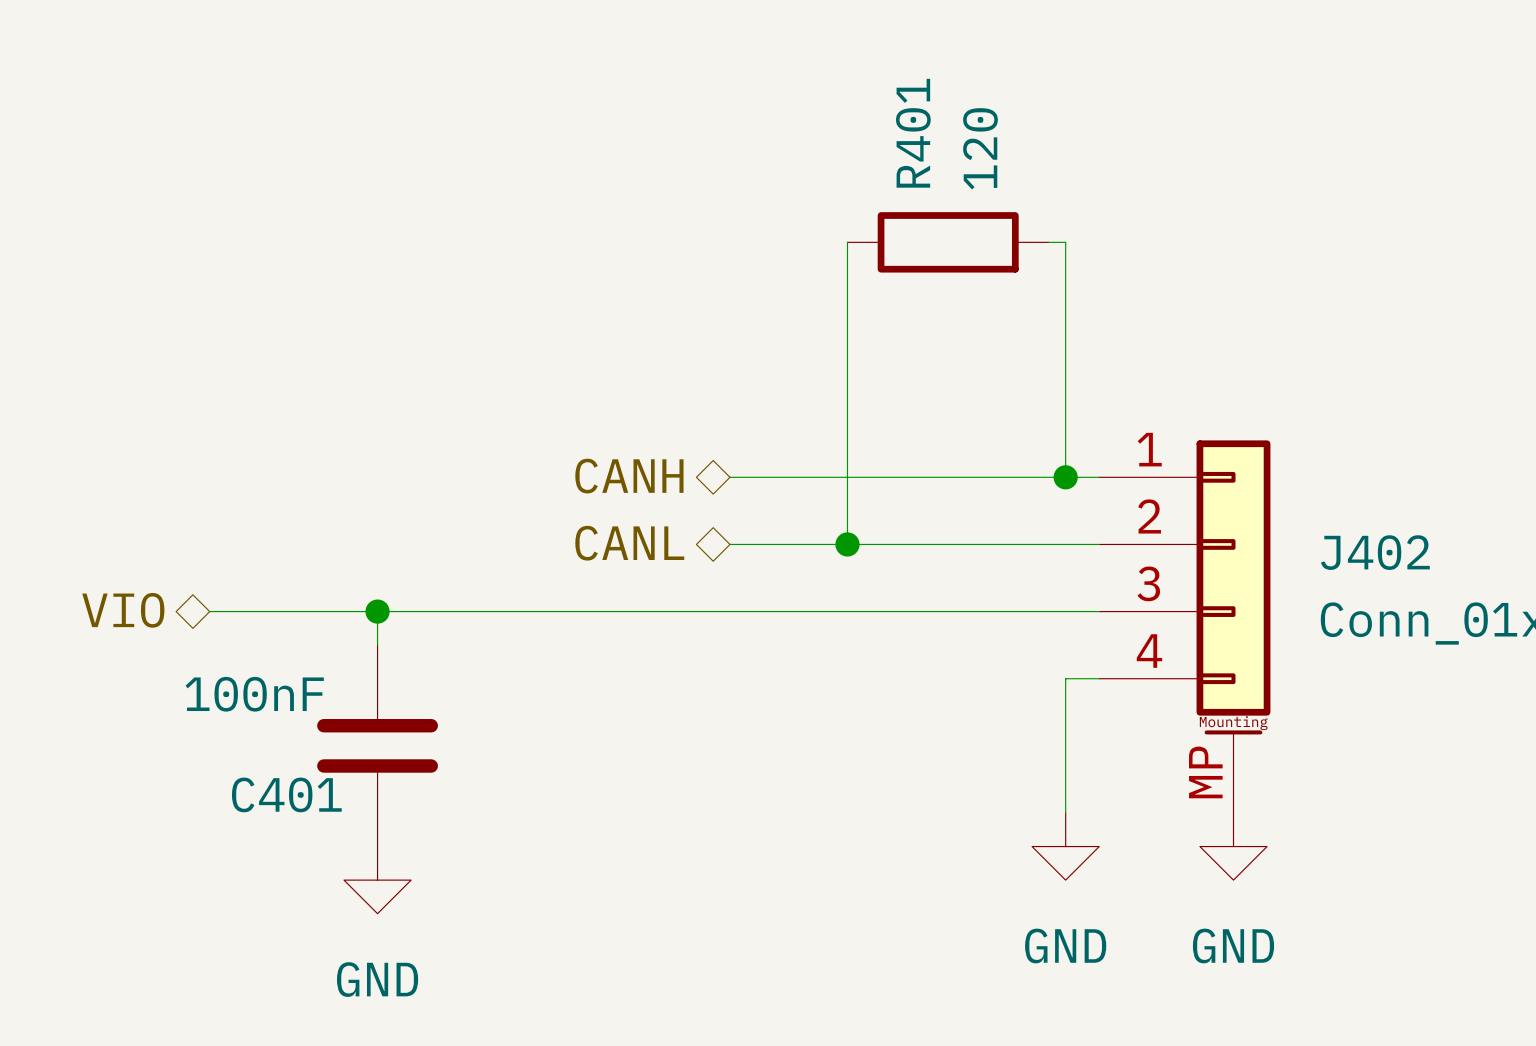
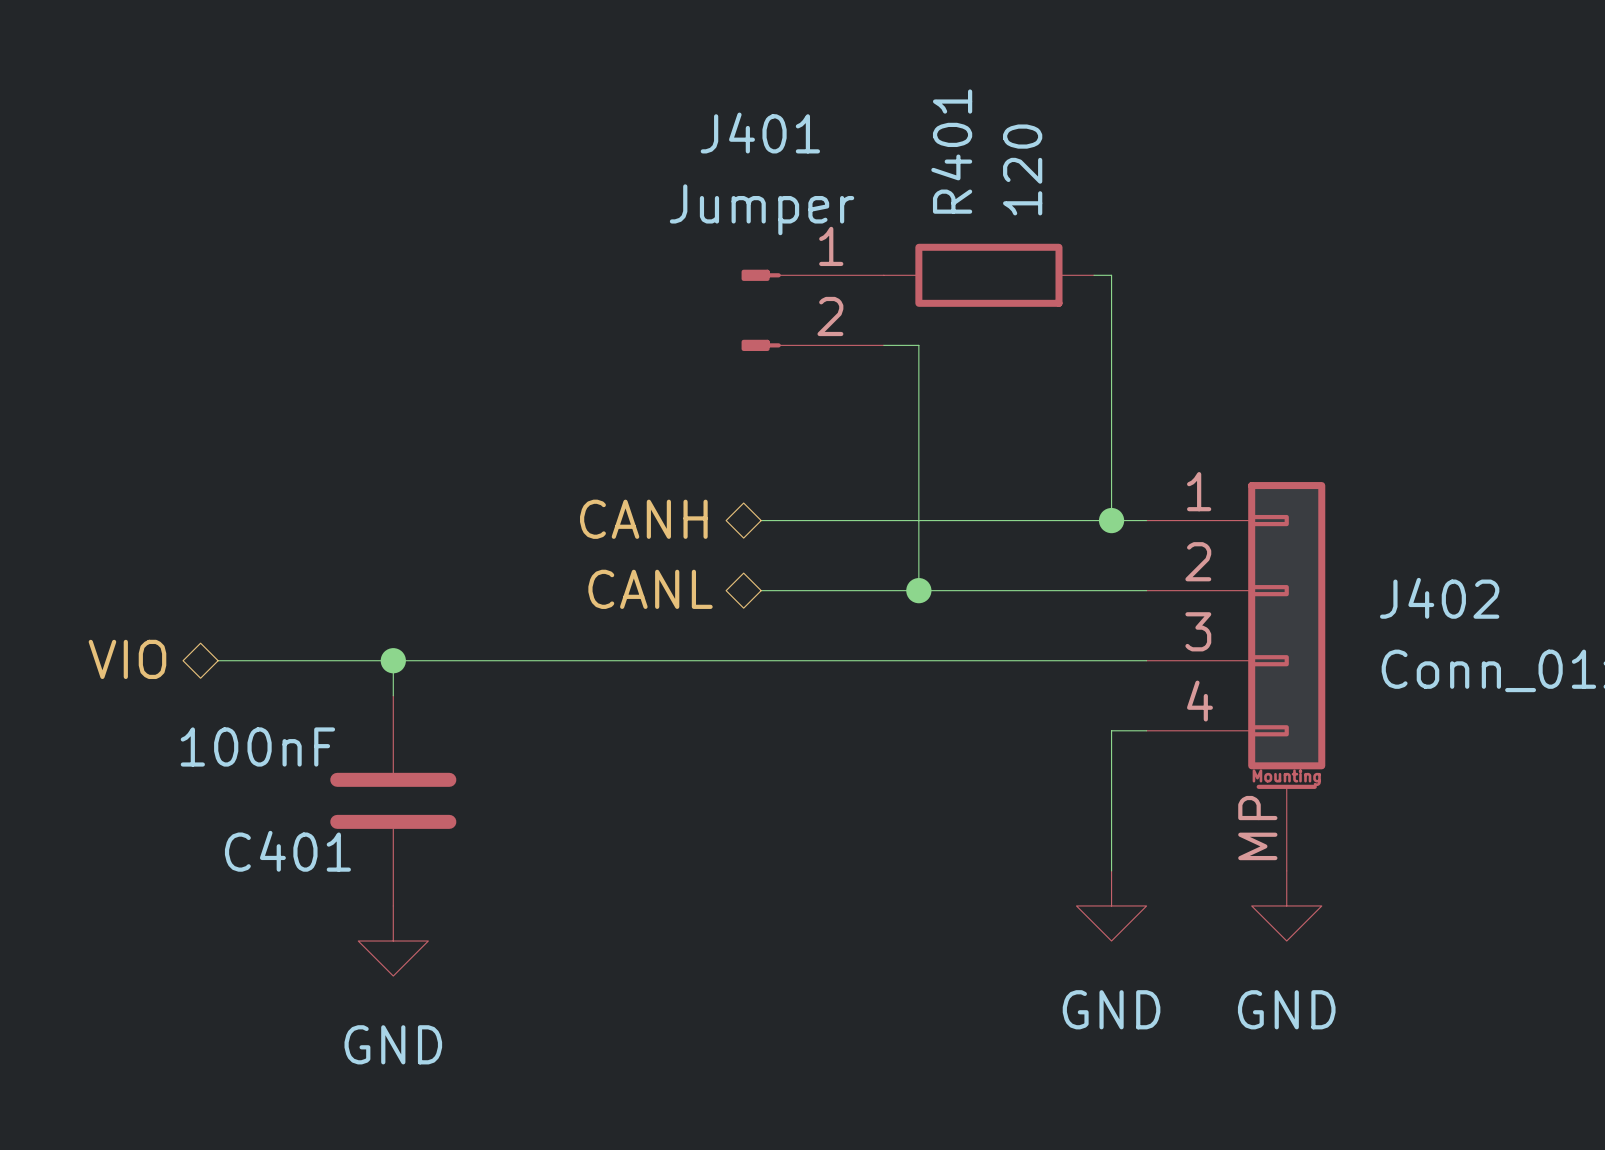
wire: (847, 242) (847, 544) -> none
J401: none -> Jumper (812, 310)
wire: none -> (883, 345) (918, 345) (918, 590)
junction position: (847, 544) -> (918, 590)

